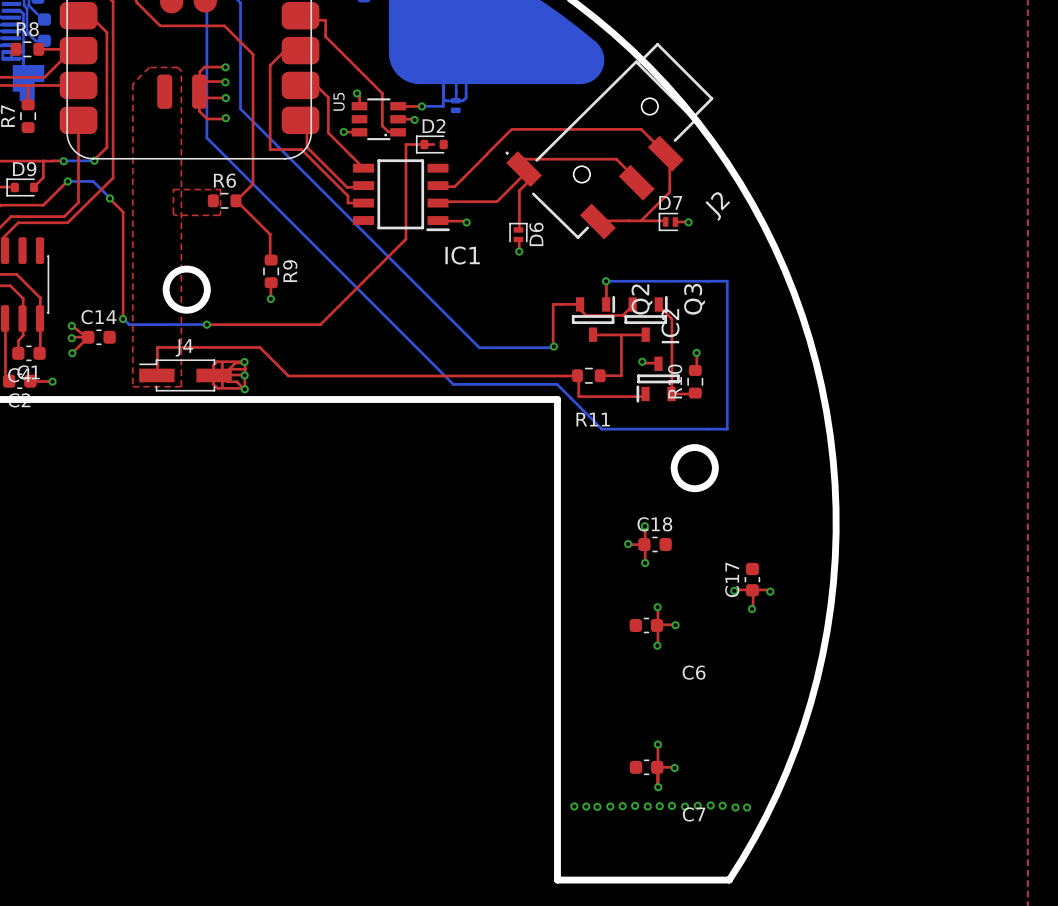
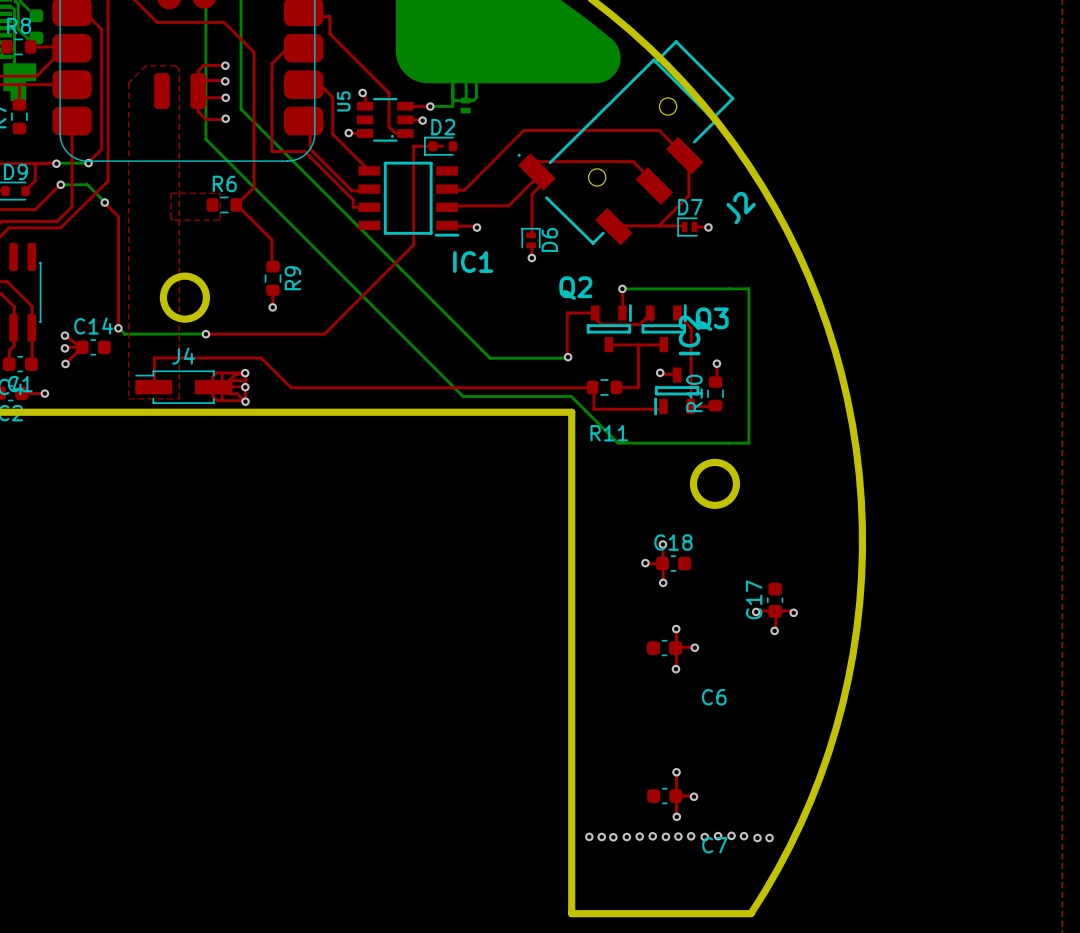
Q2 name rotation: 0° (641, 299) -> 90° clockwise (575, 288)
Q2 name position: Q2 (641, 299) -> Q2 (575, 288)
Q3 name rotation: 0° (694, 299) -> 90° clockwise (712, 319)

